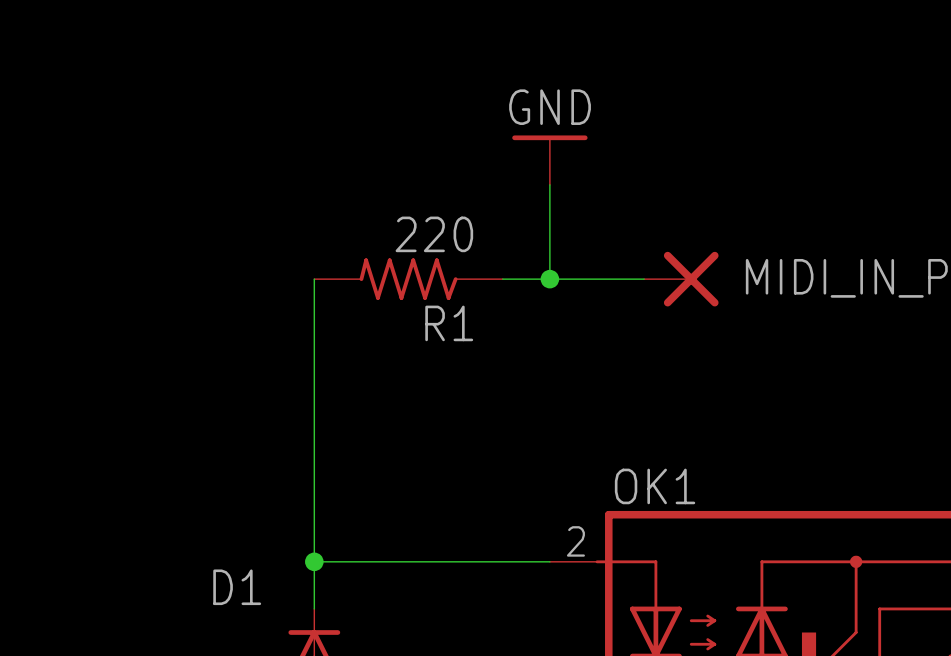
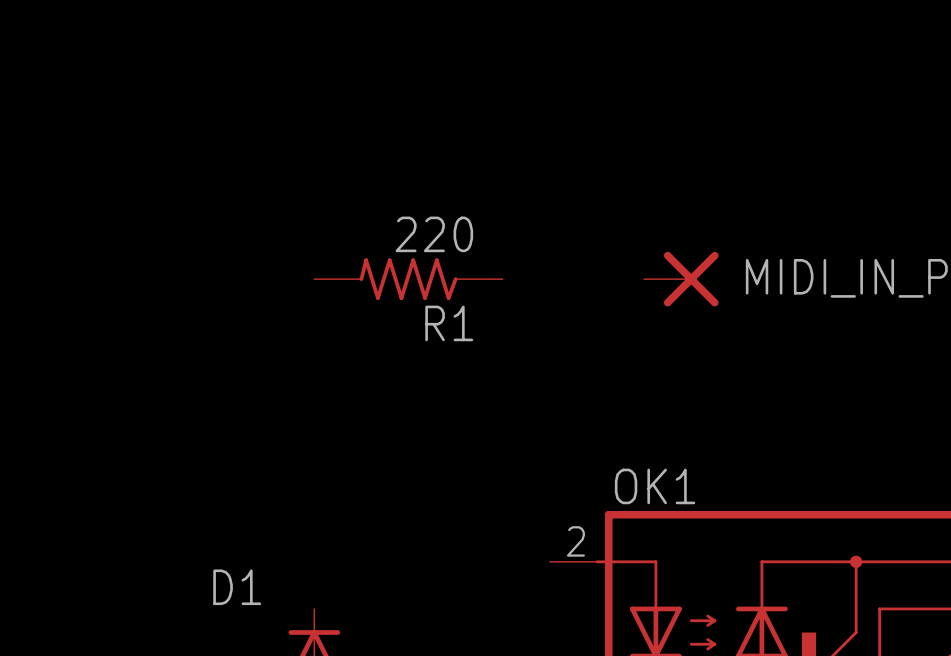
power symbol: GND (549, 160) -> none
wire: (549, 184) (549, 279) -> none
wire: (314, 279) (314, 608) -> none
wire: (502, 279) (644, 279) -> none
junction: (549, 279) -> none
wire: (314, 561) (549, 561) -> none
junction: (314, 561) -> none

